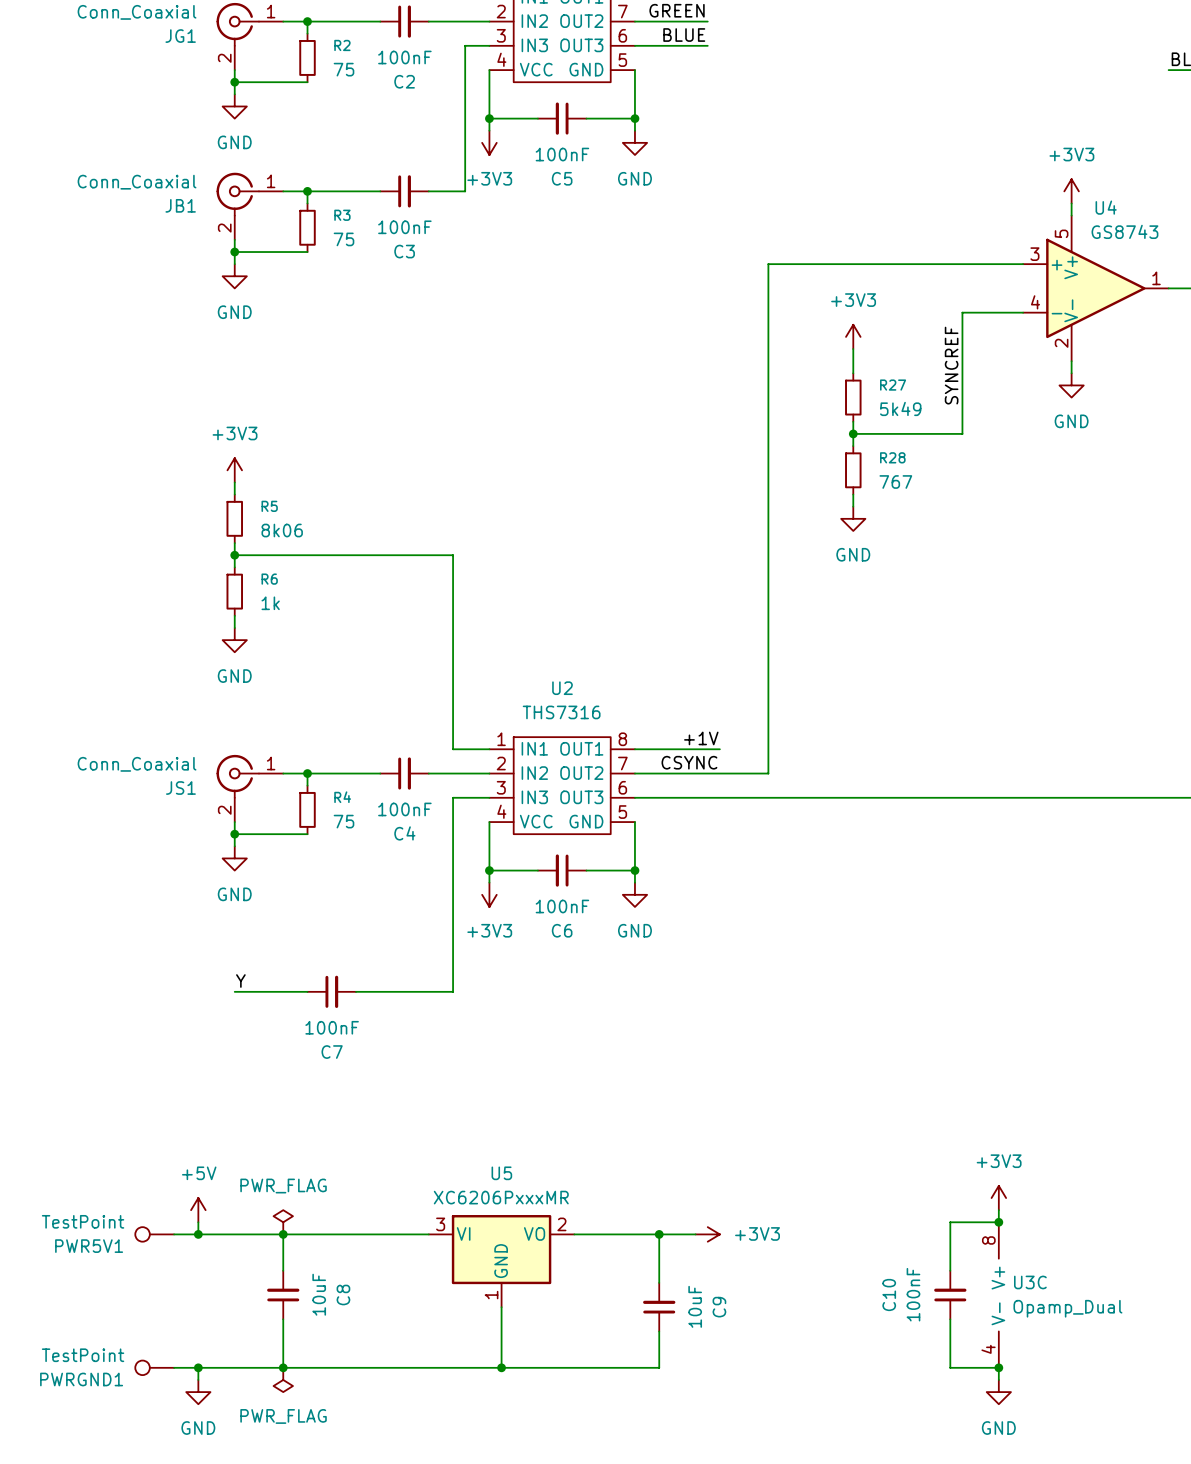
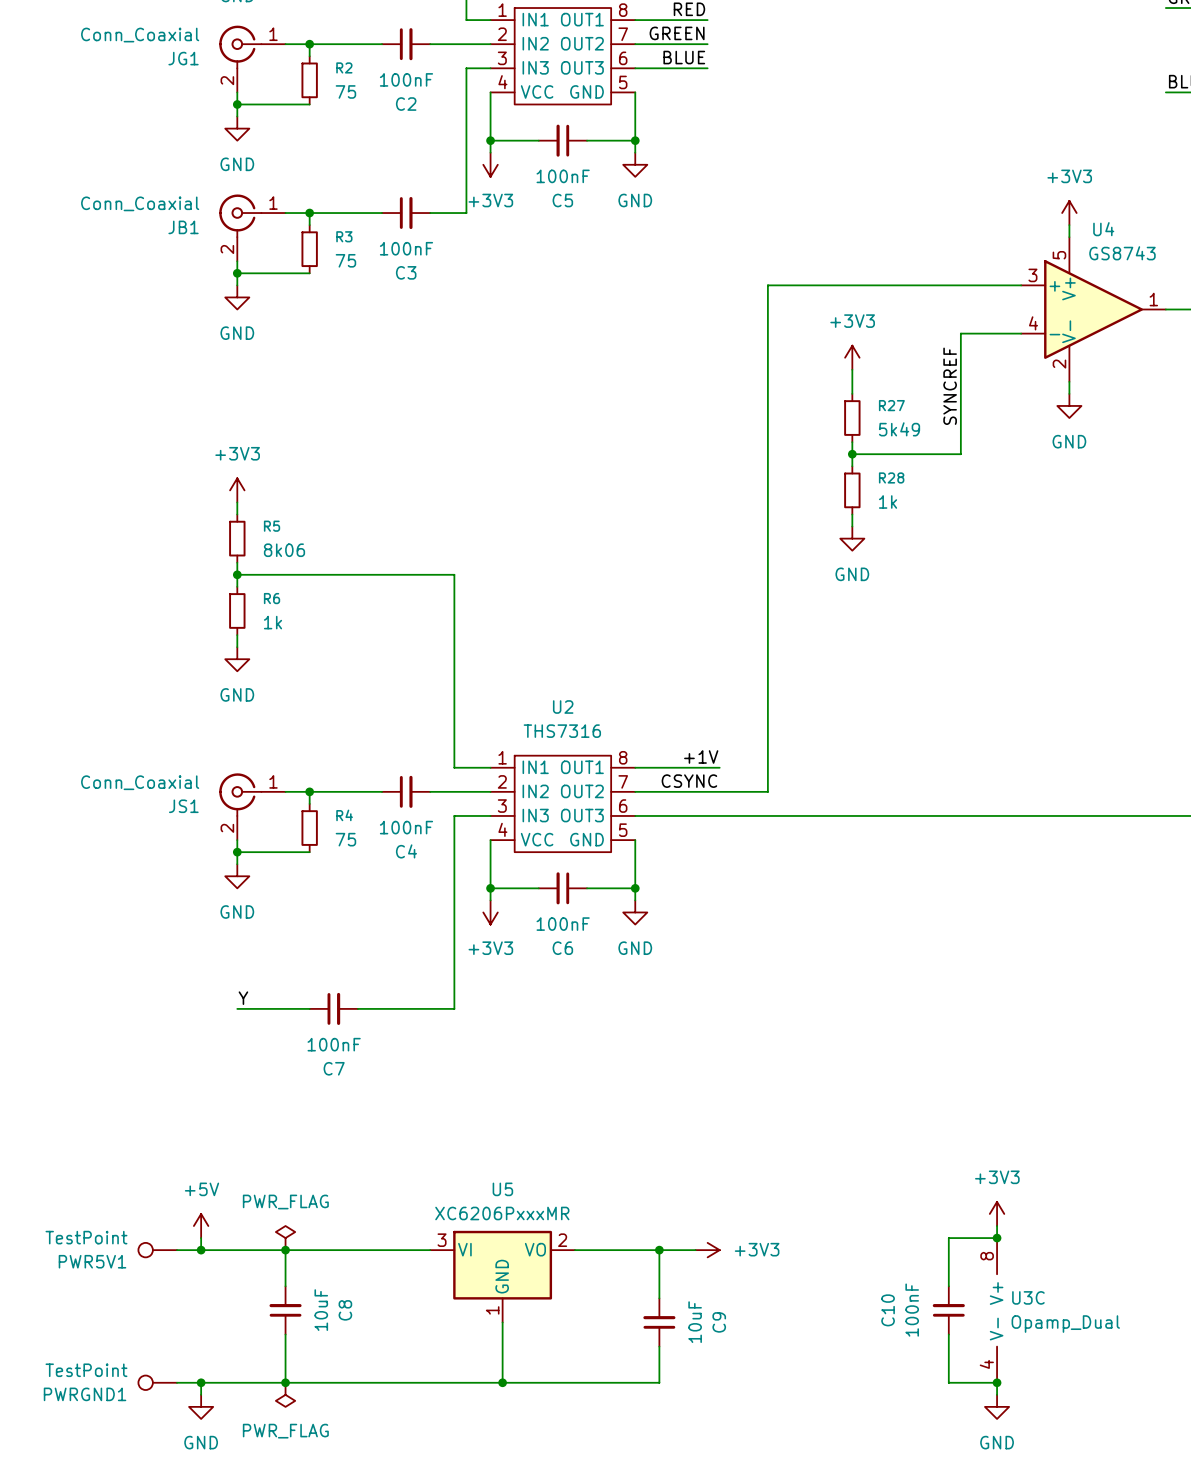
R28 value: 767 (895, 482) -> 1k (888, 501)

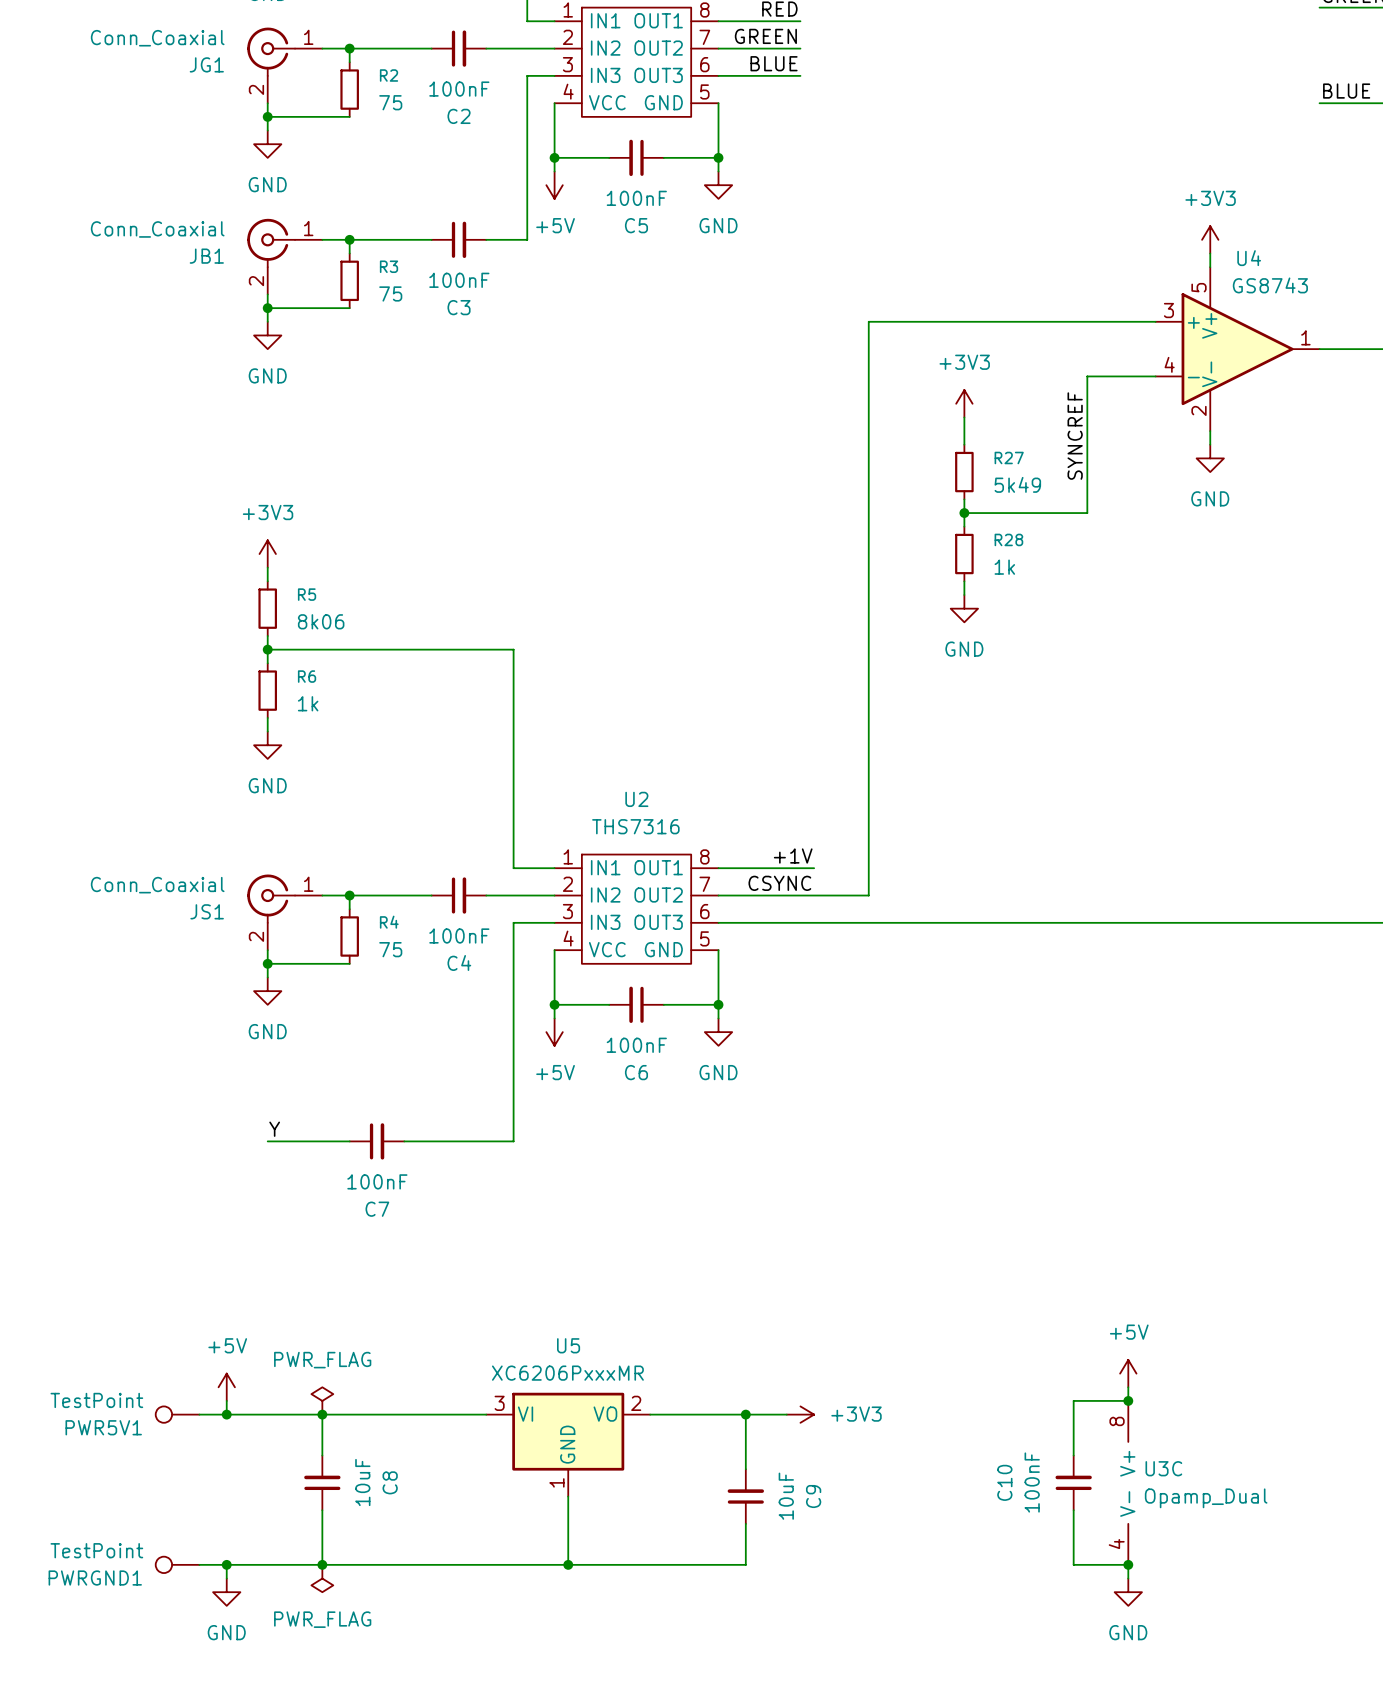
power symbol: +3V3 (490, 164) -> +5V (554, 185)
power symbol: +3V3 (490, 912) -> +5V (554, 1032)
power symbol: +3V3 (997, 1213) -> +5V (1128, 1373)

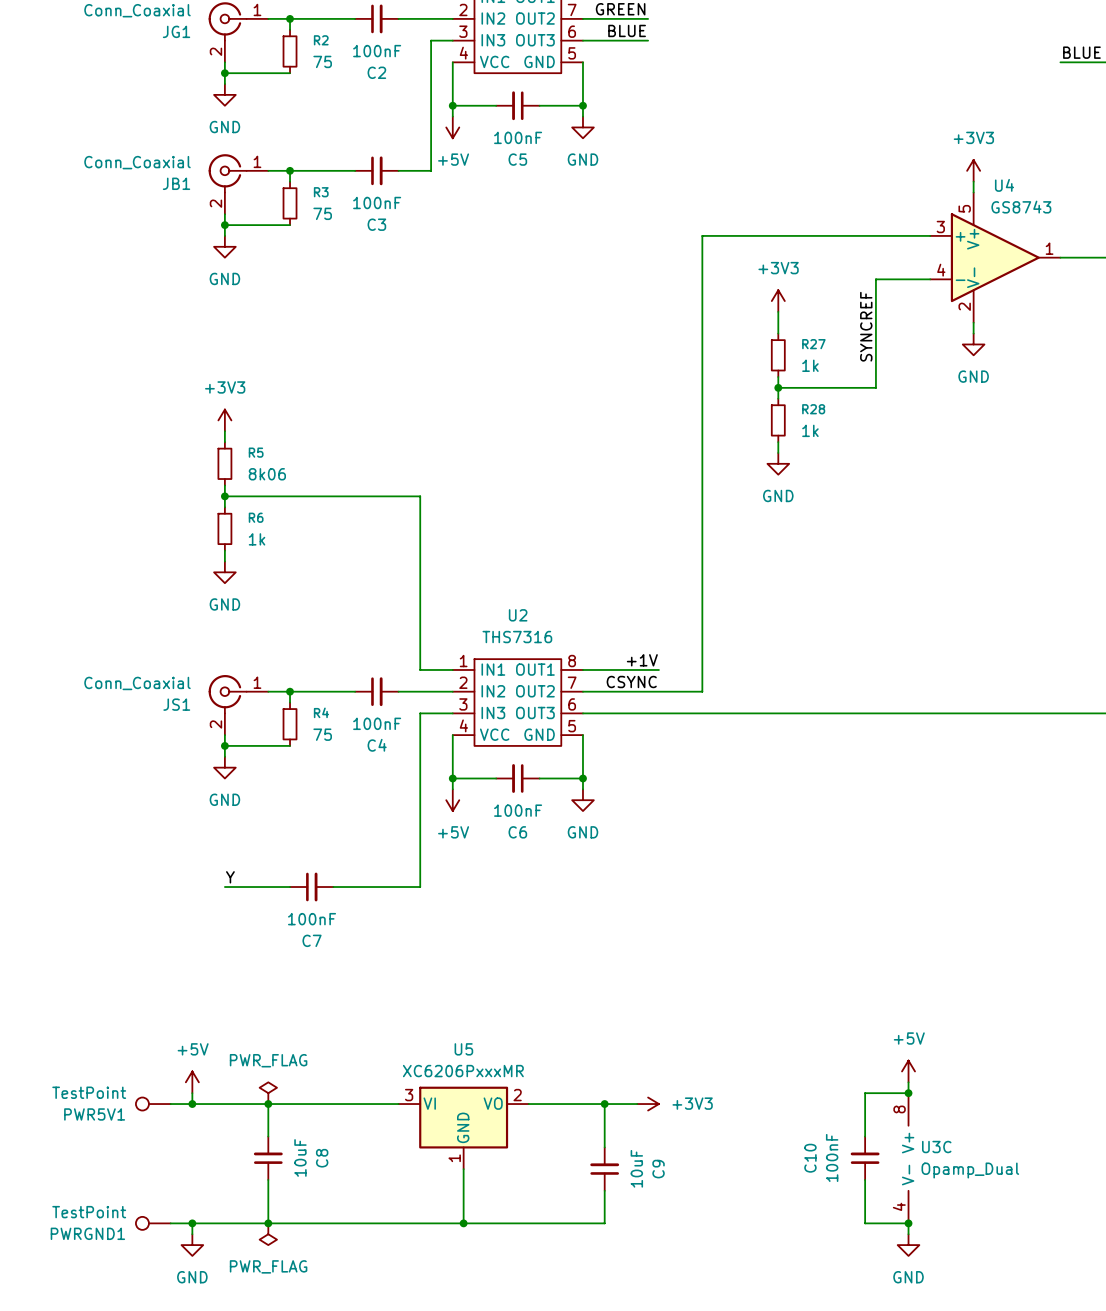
R27 value: 5k49 (1017, 484) -> 1k (810, 365)

